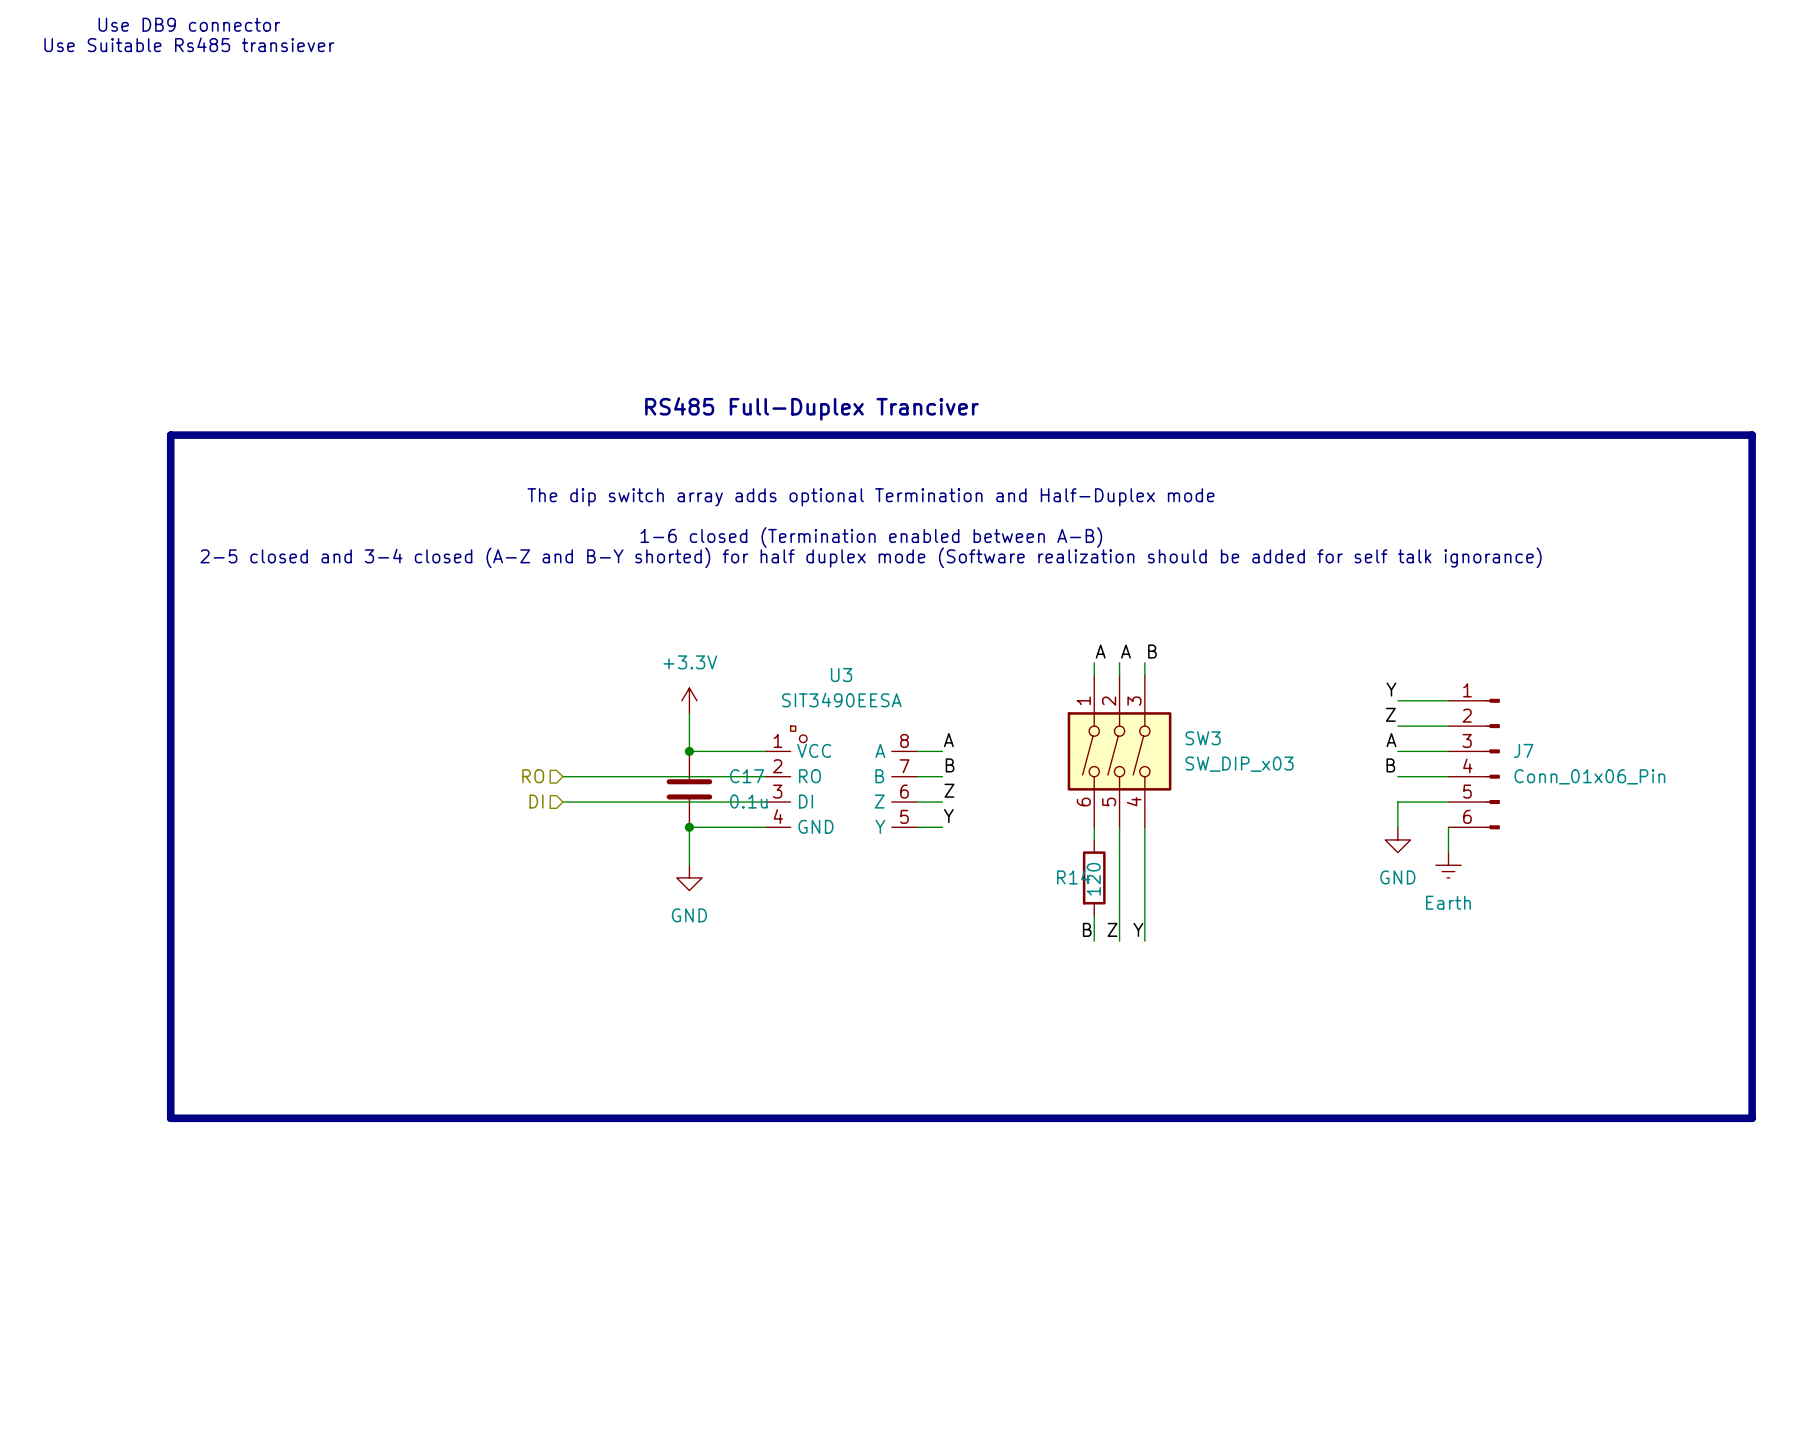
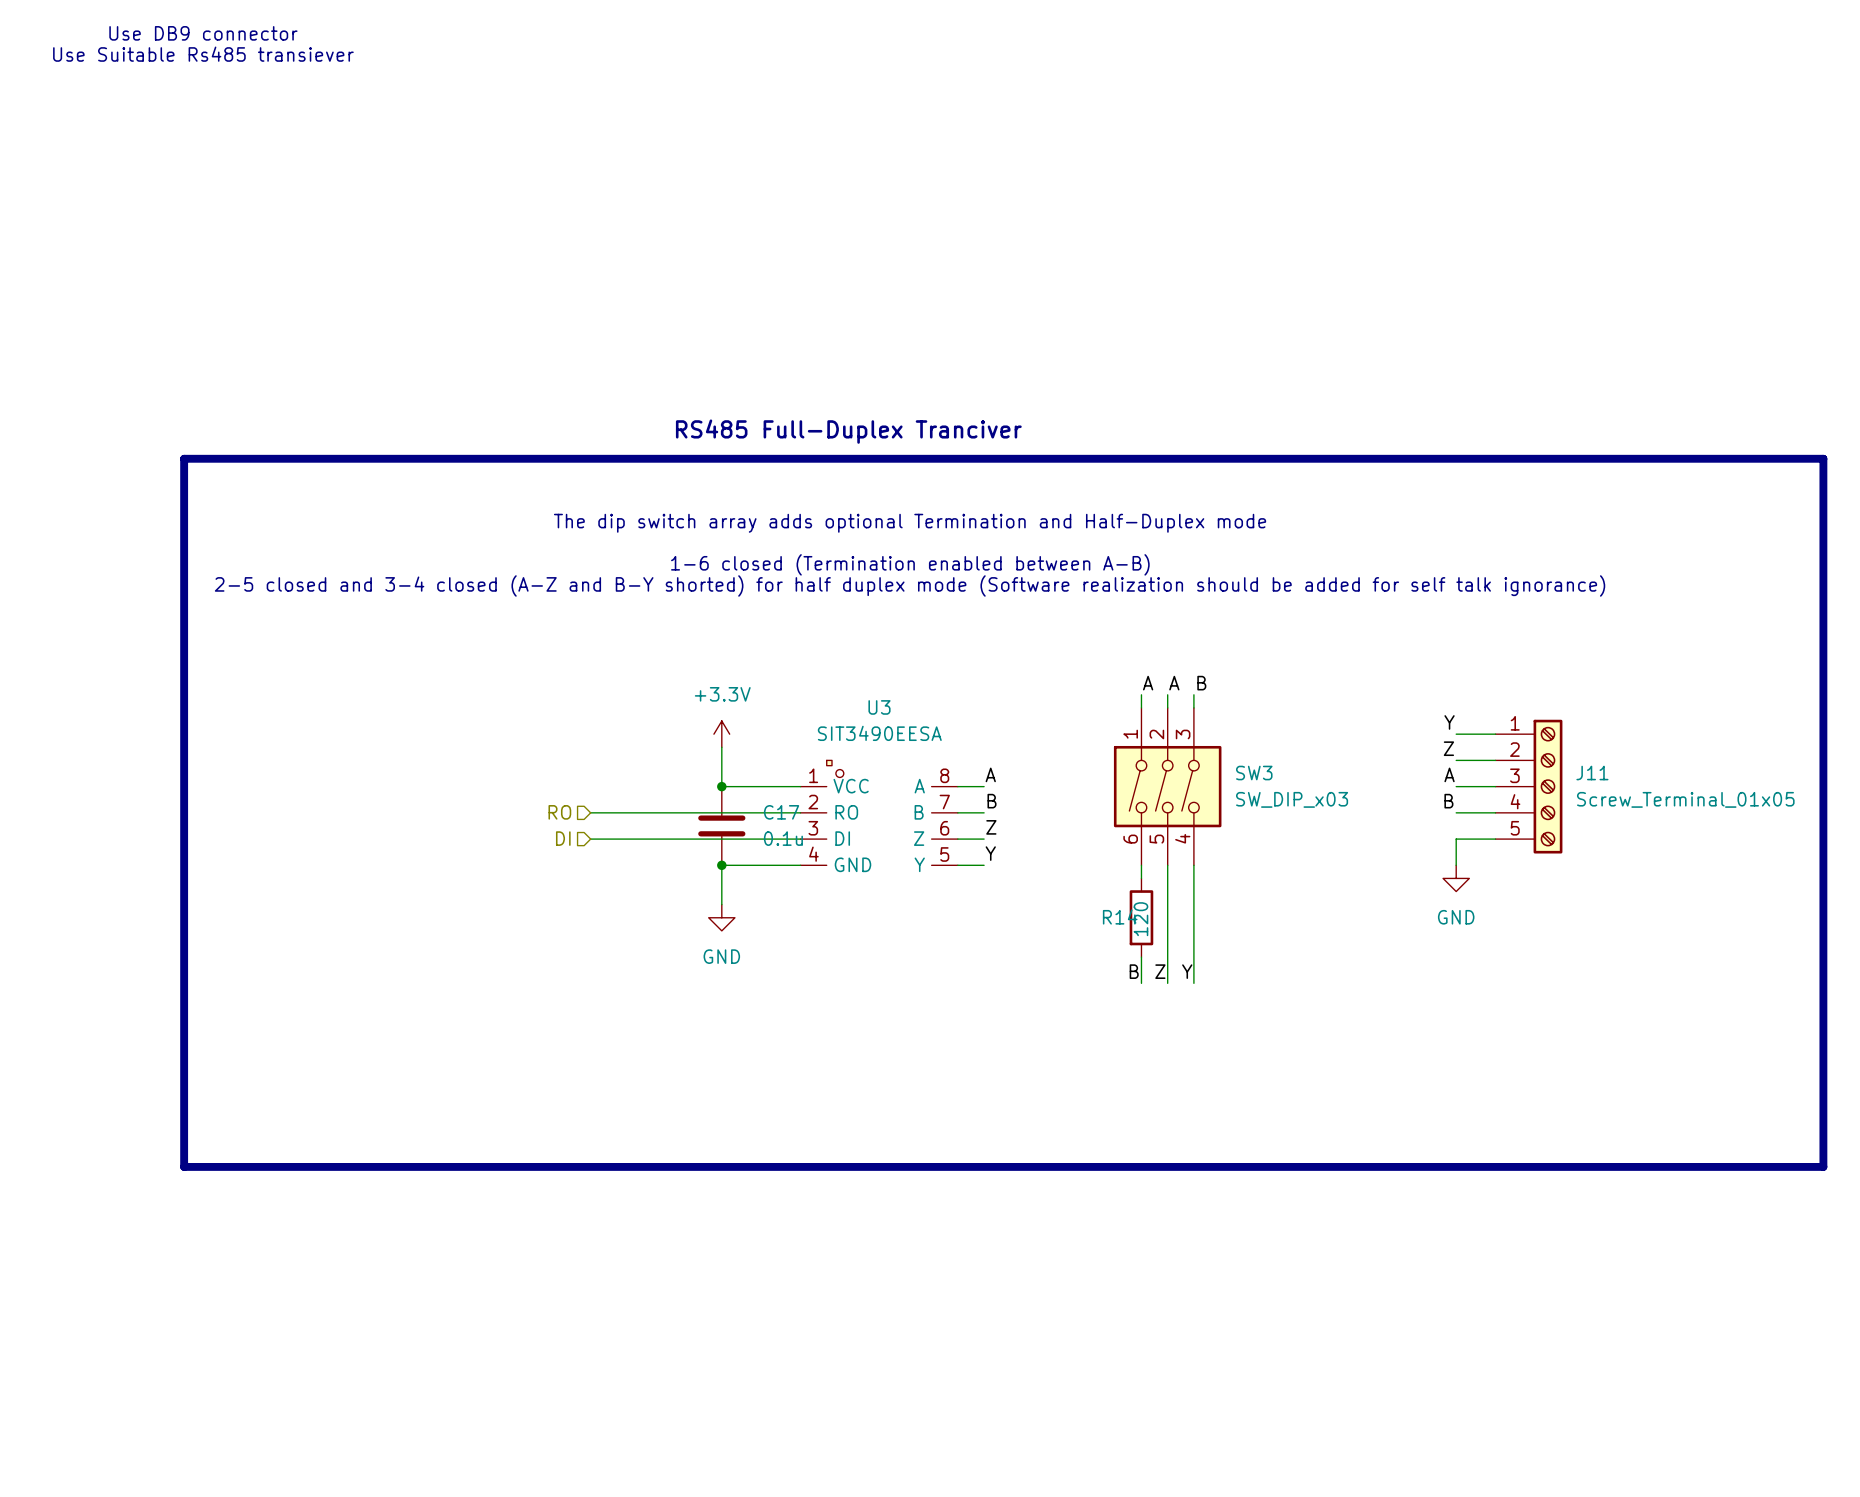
J11: none -> Screw_Terminal_01x05 (1528, 786)
J7: Conn_01x06_Pin (1474, 764) -> none
wire: (1448, 827) (1448, 852) -> none
power symbol: Earth (1448, 865) -> none

